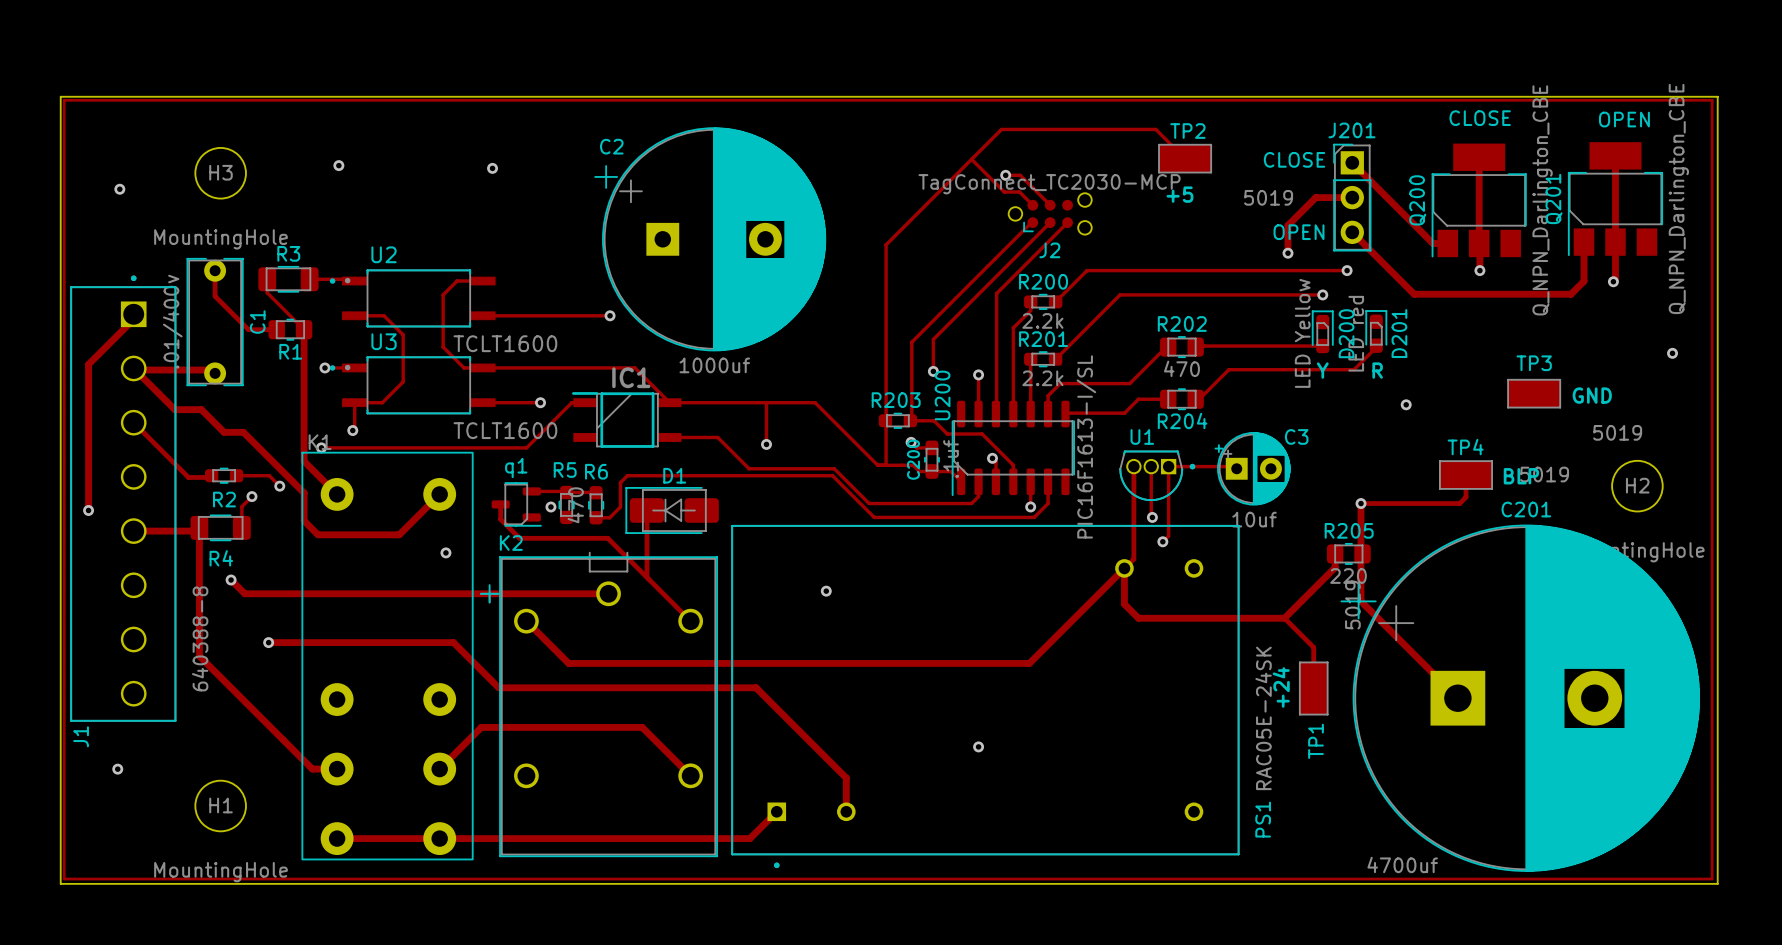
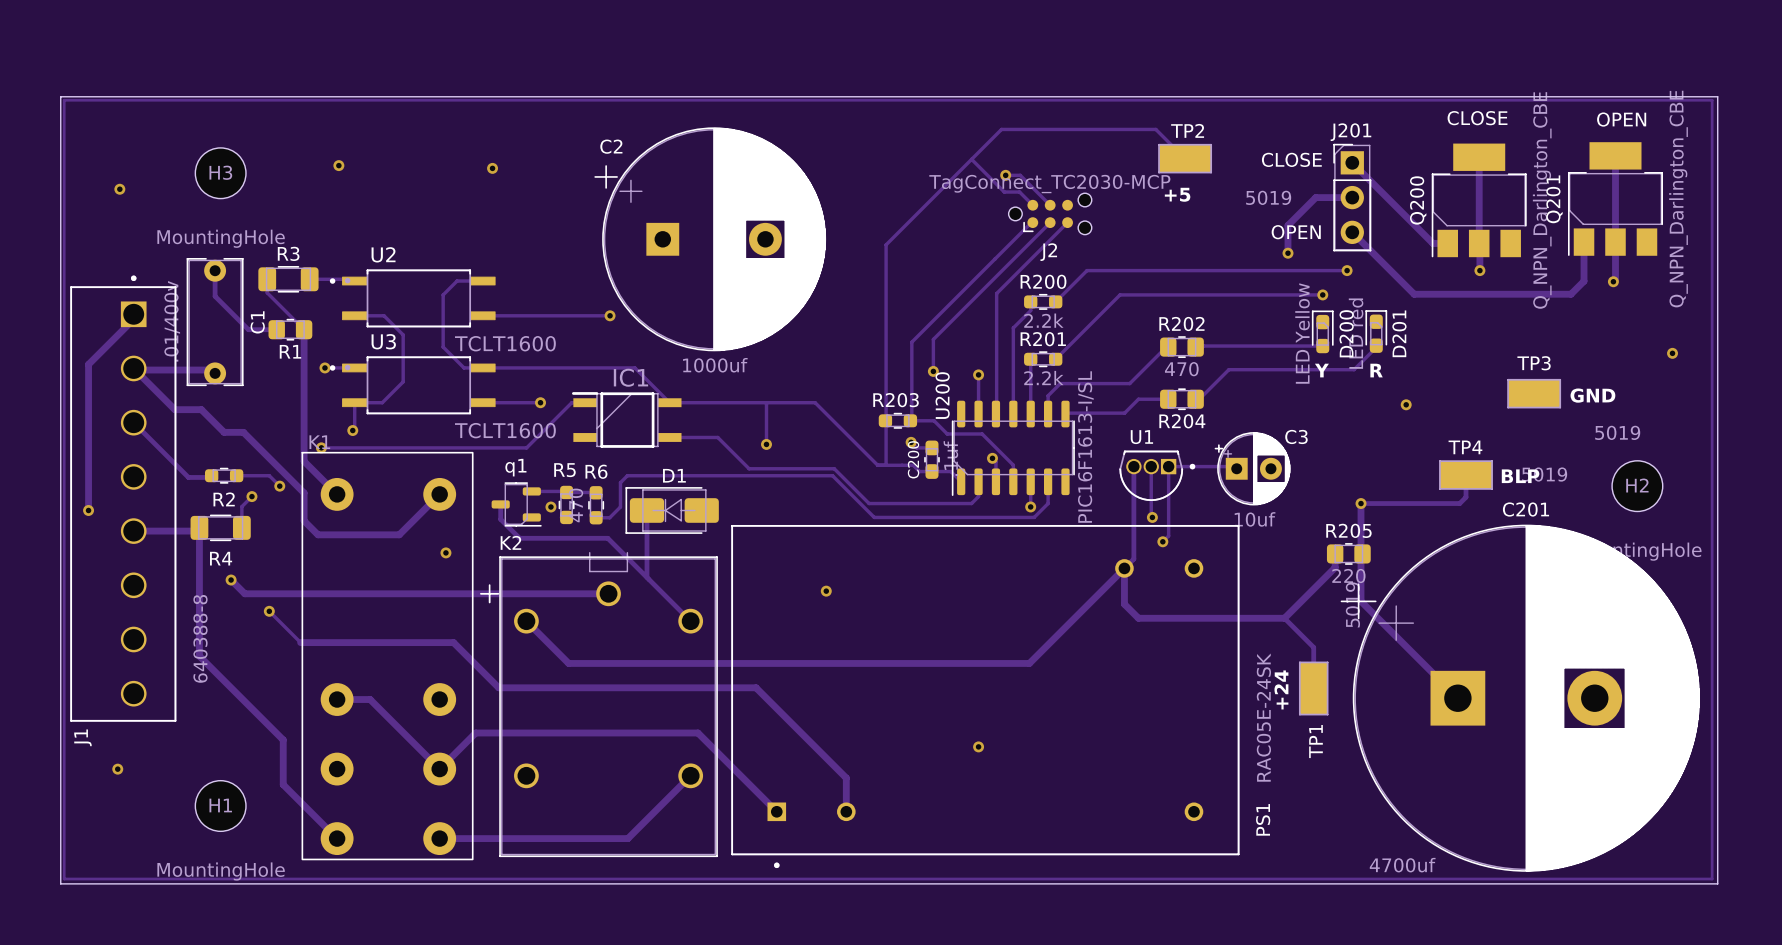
track: (268, 642) (300, 642) -> (269, 611) (300, 642)
via position: (268, 642) -> (269, 611)
track: none -> (337, 699) (370, 699) (439, 769)
track: (475, 732) (481, 727) (642, 727) (690, 775) -> (475, 732) (697, 732) (776, 811)
track: (283, 739) (312, 769) (337, 769) -> (283, 739) (283, 784) (337, 838)
track: (776, 811) (749, 838) (627, 838) -> (690, 775) (627, 838)
track: (337, 838) (439, 838) -> none

